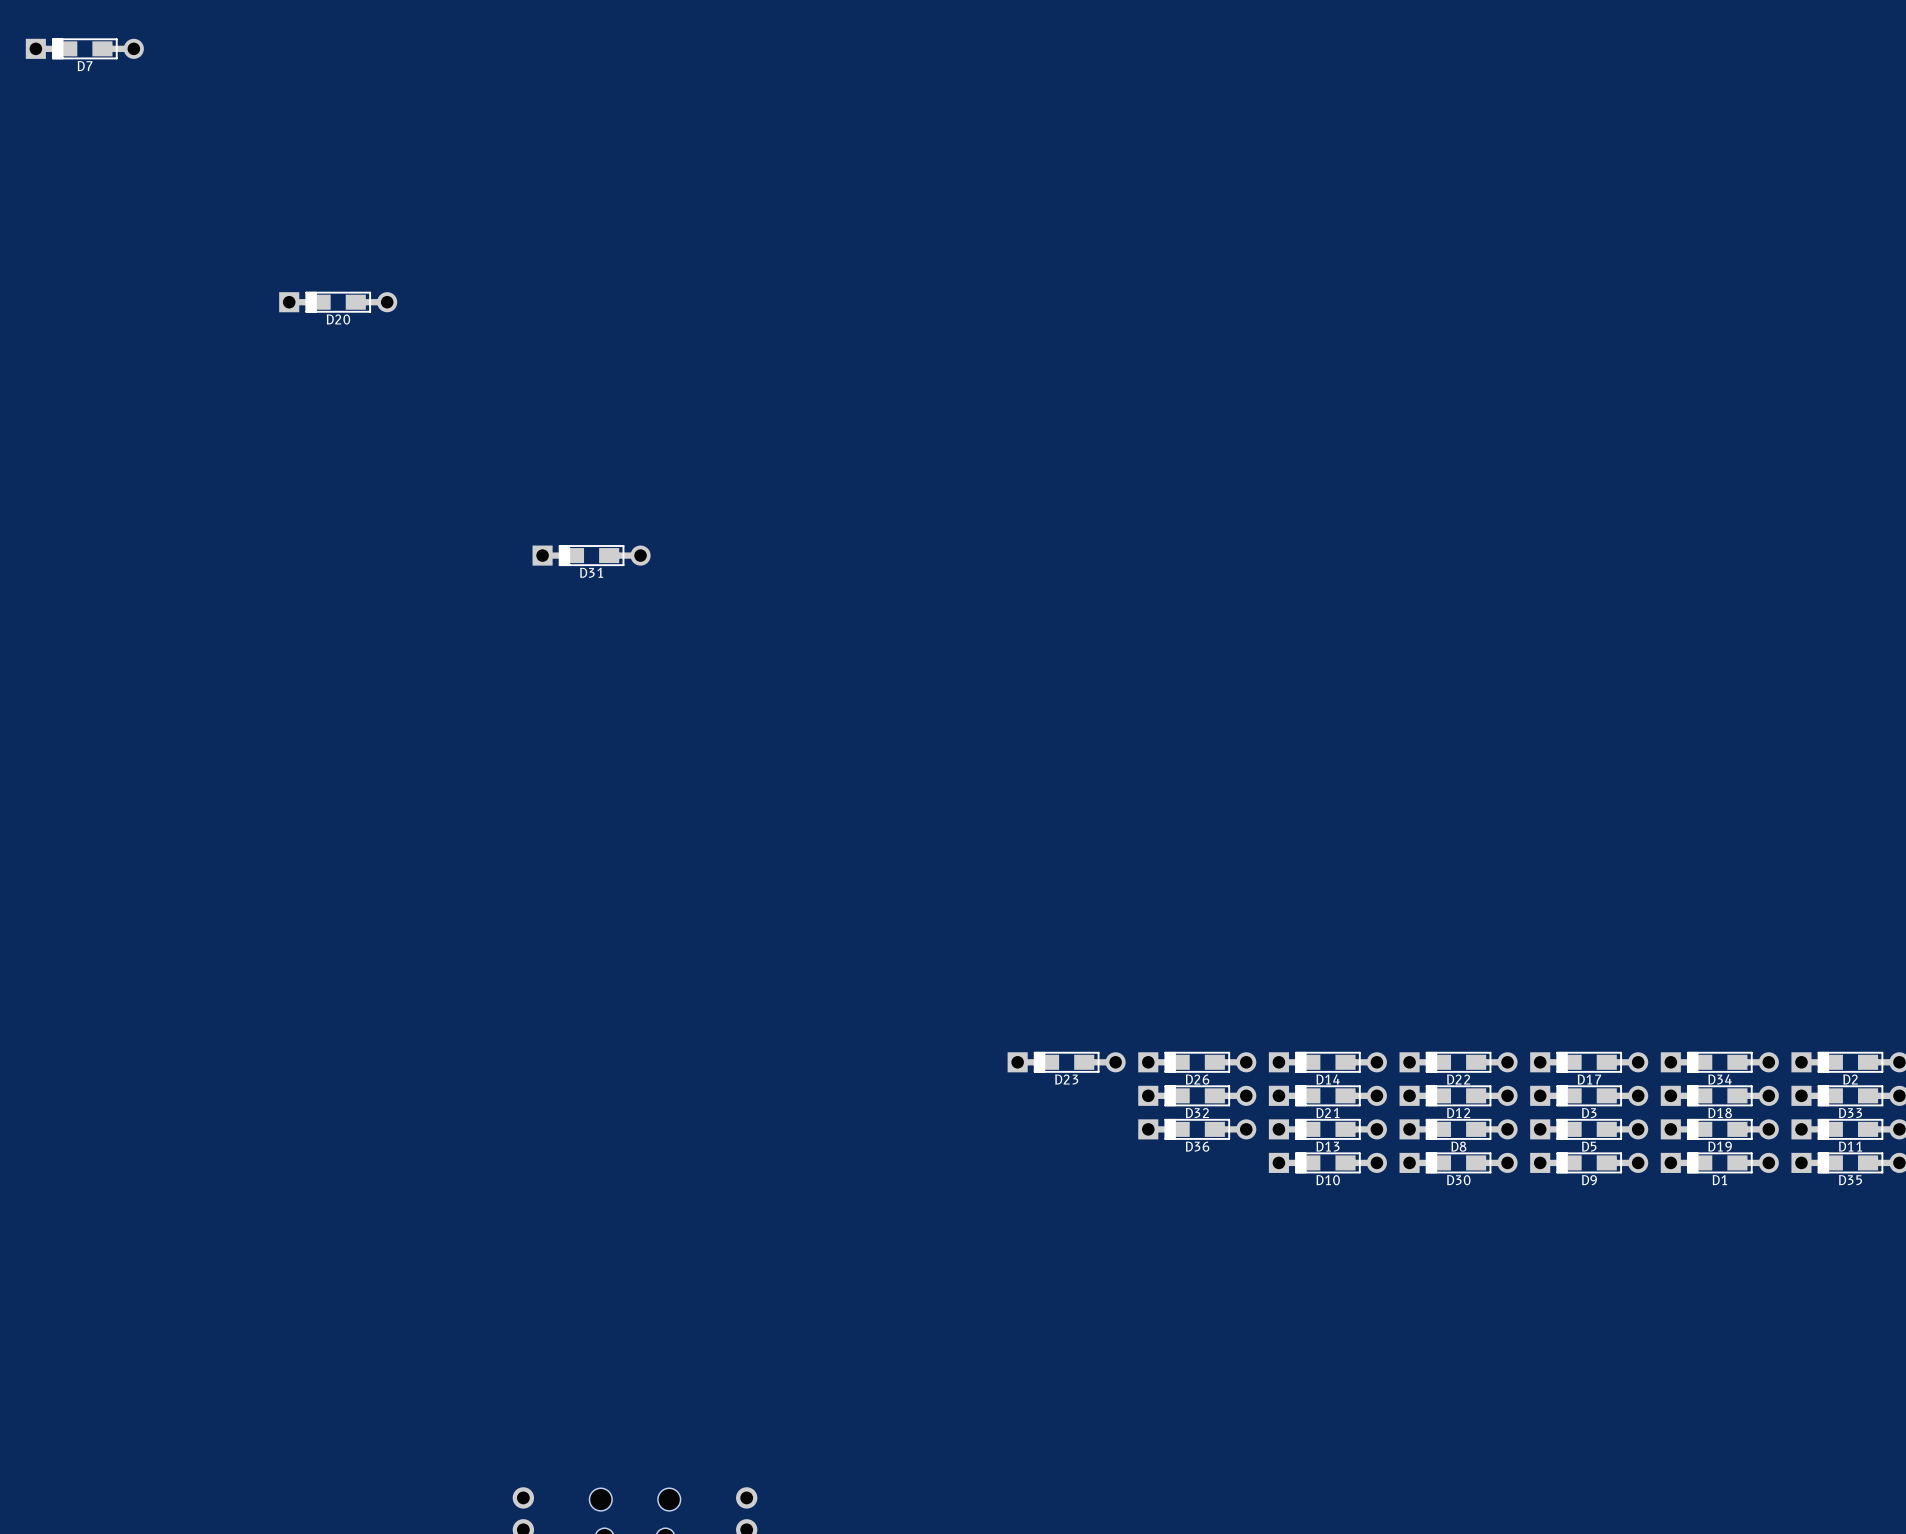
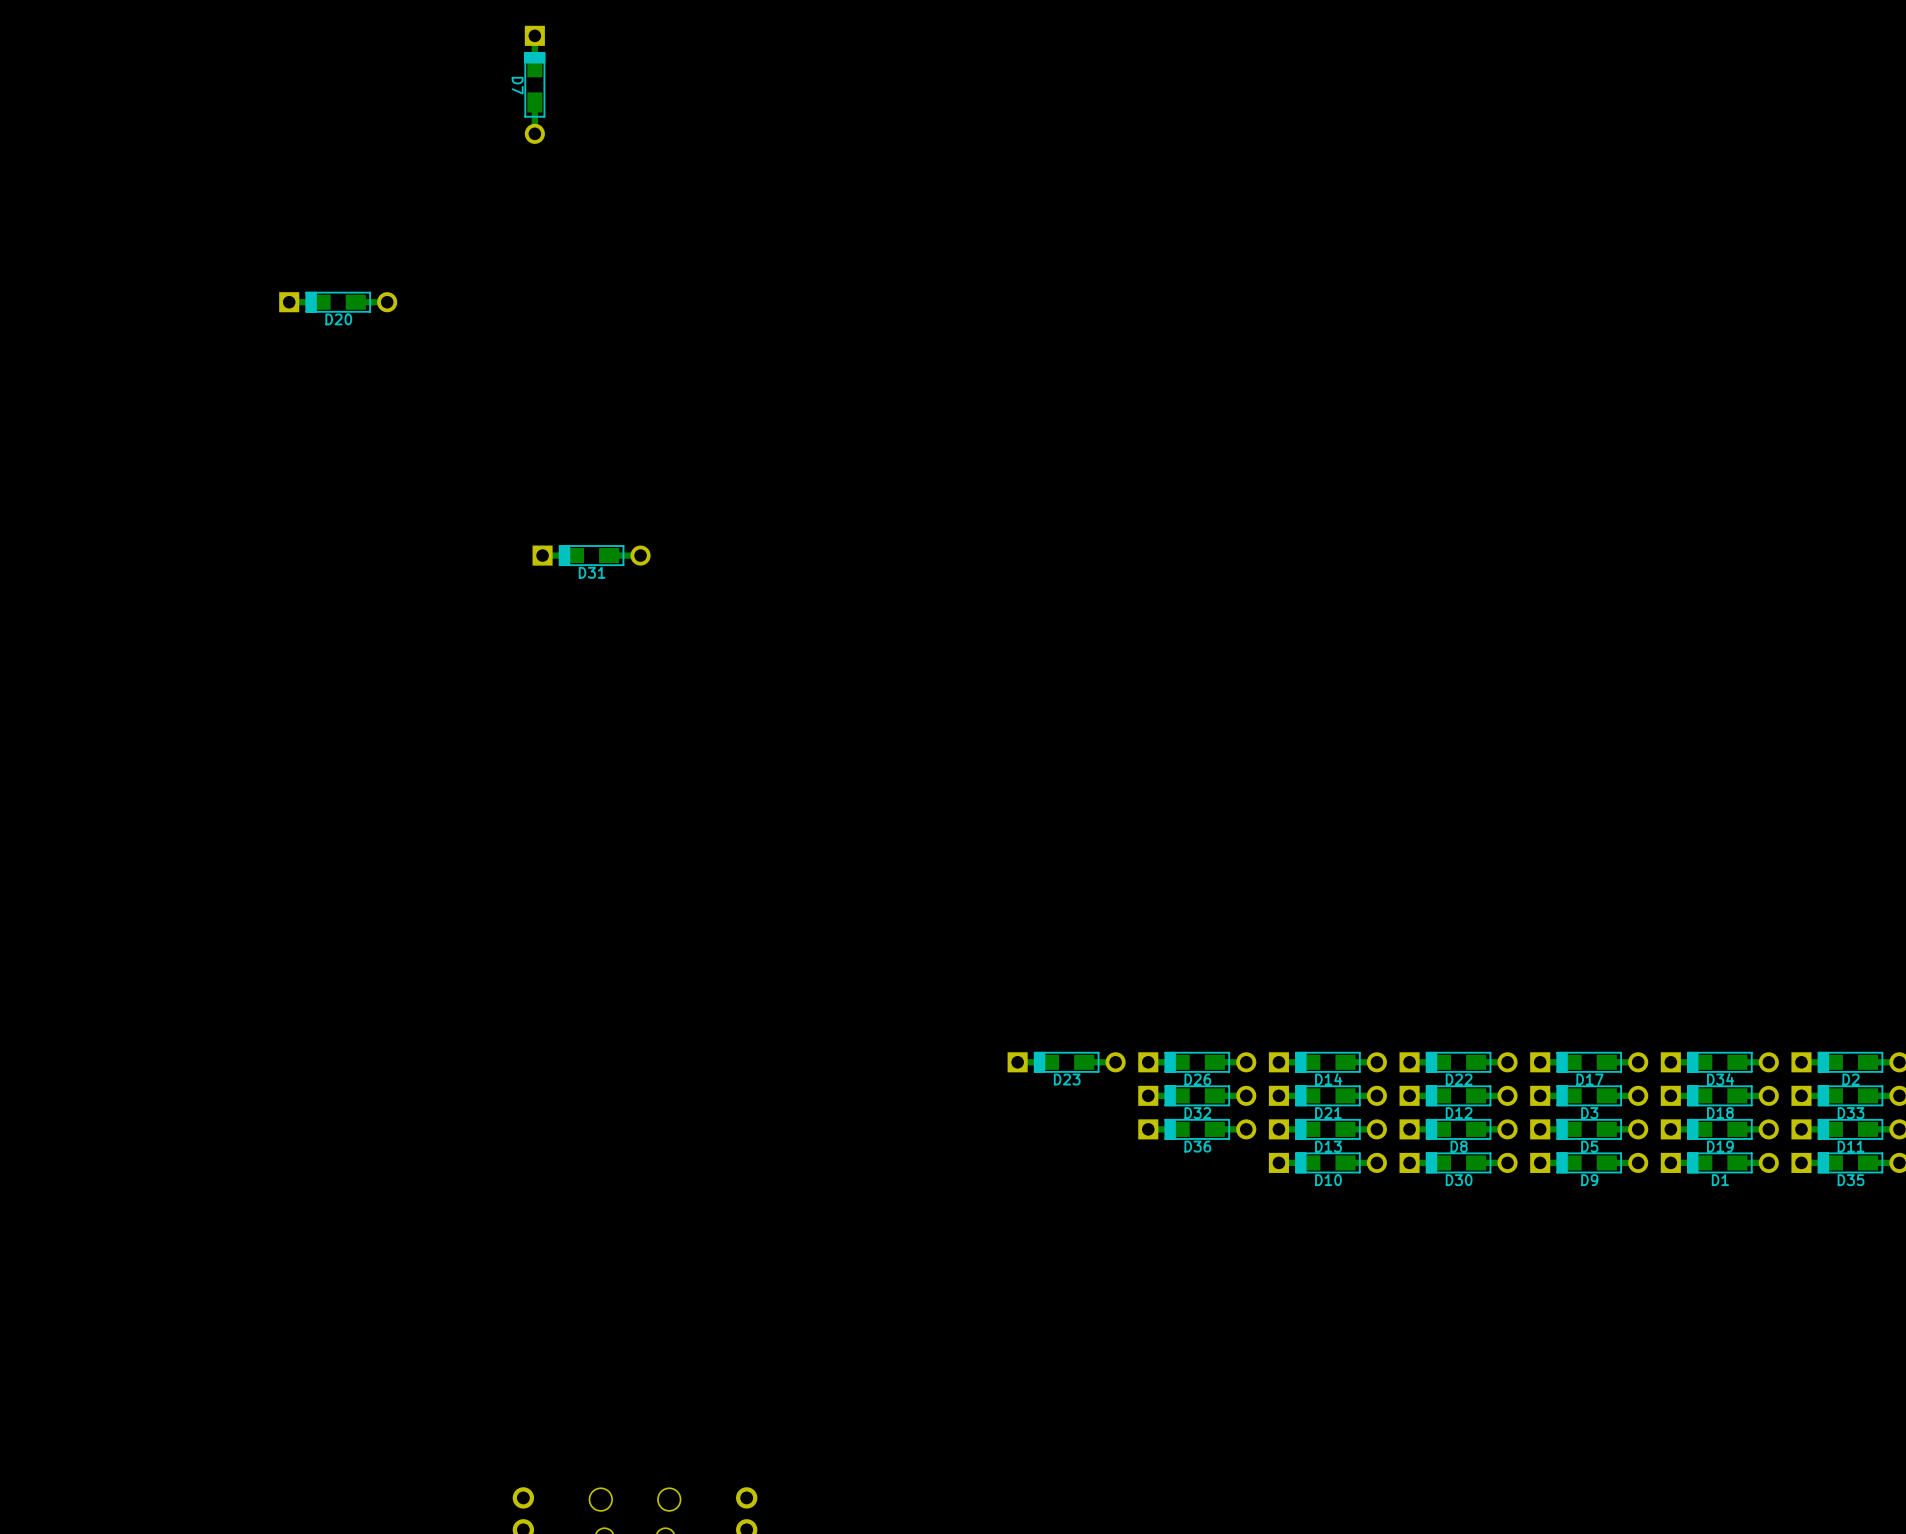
D7 rotation: 0° (84, 48) -> 90° clockwise (534, 84)
D7 position: (84, 48) -> (534, 84)

